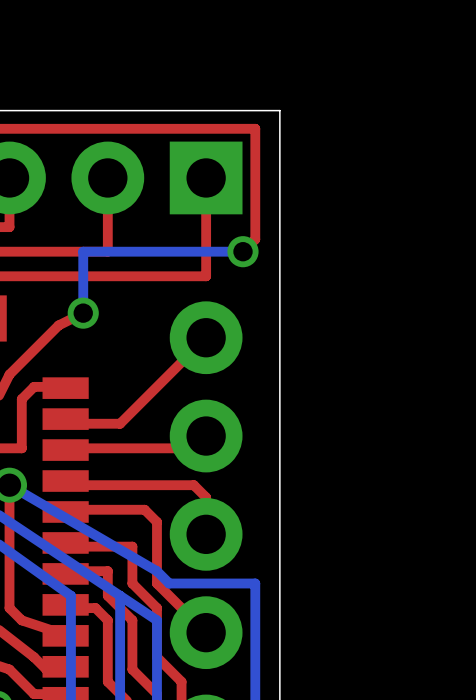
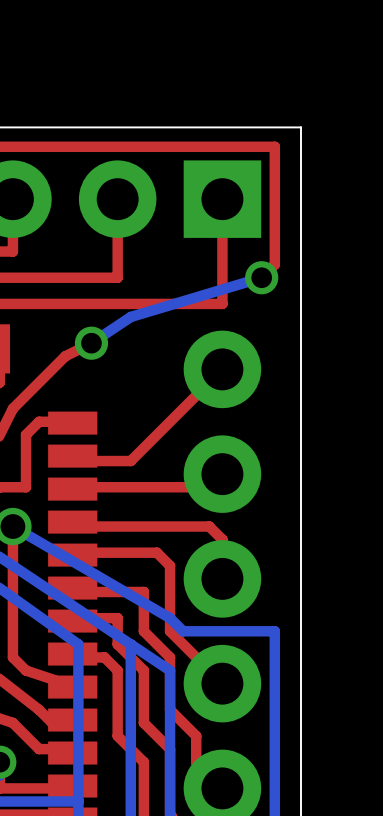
bottom track: (243, 251) (83, 251) (83, 313) -> (261, 277) (130, 317) (91, 343)

